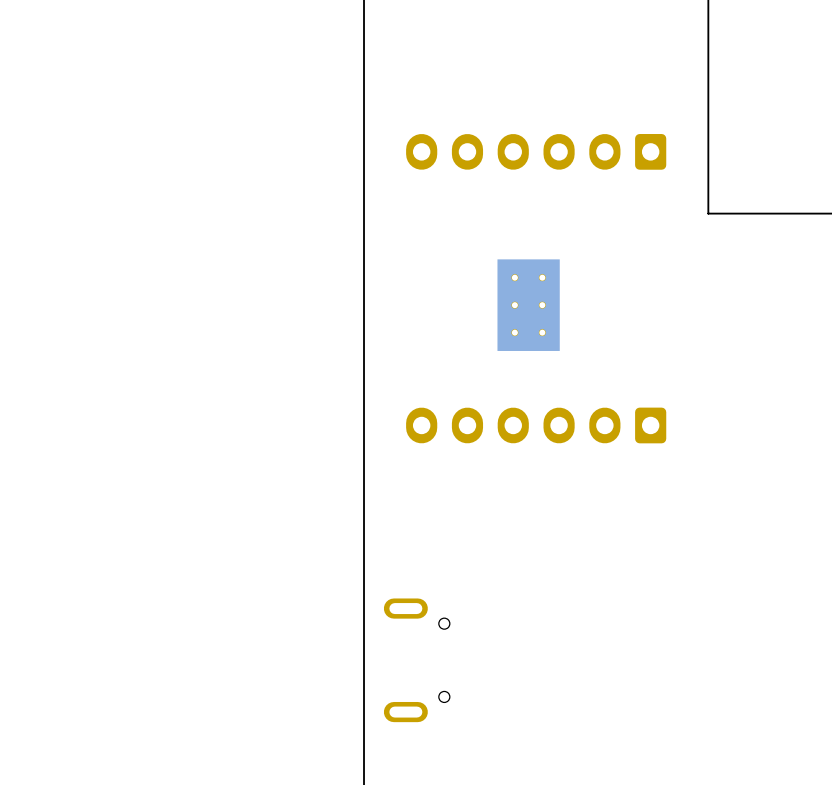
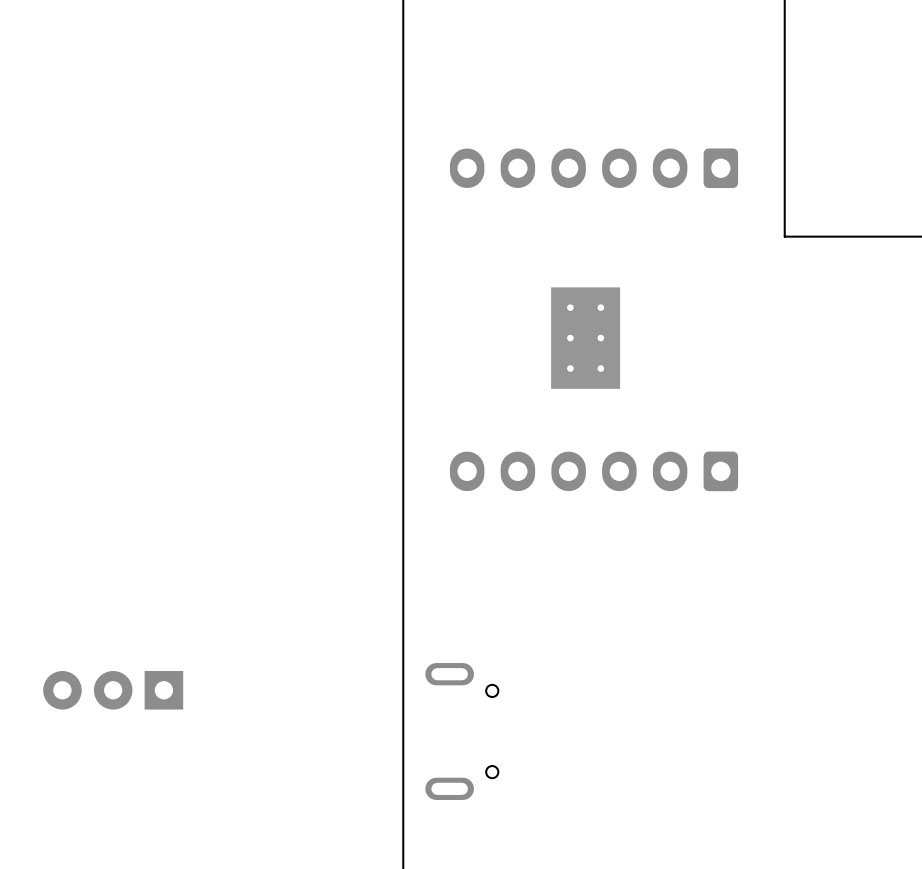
part: none -> (113, 690)

